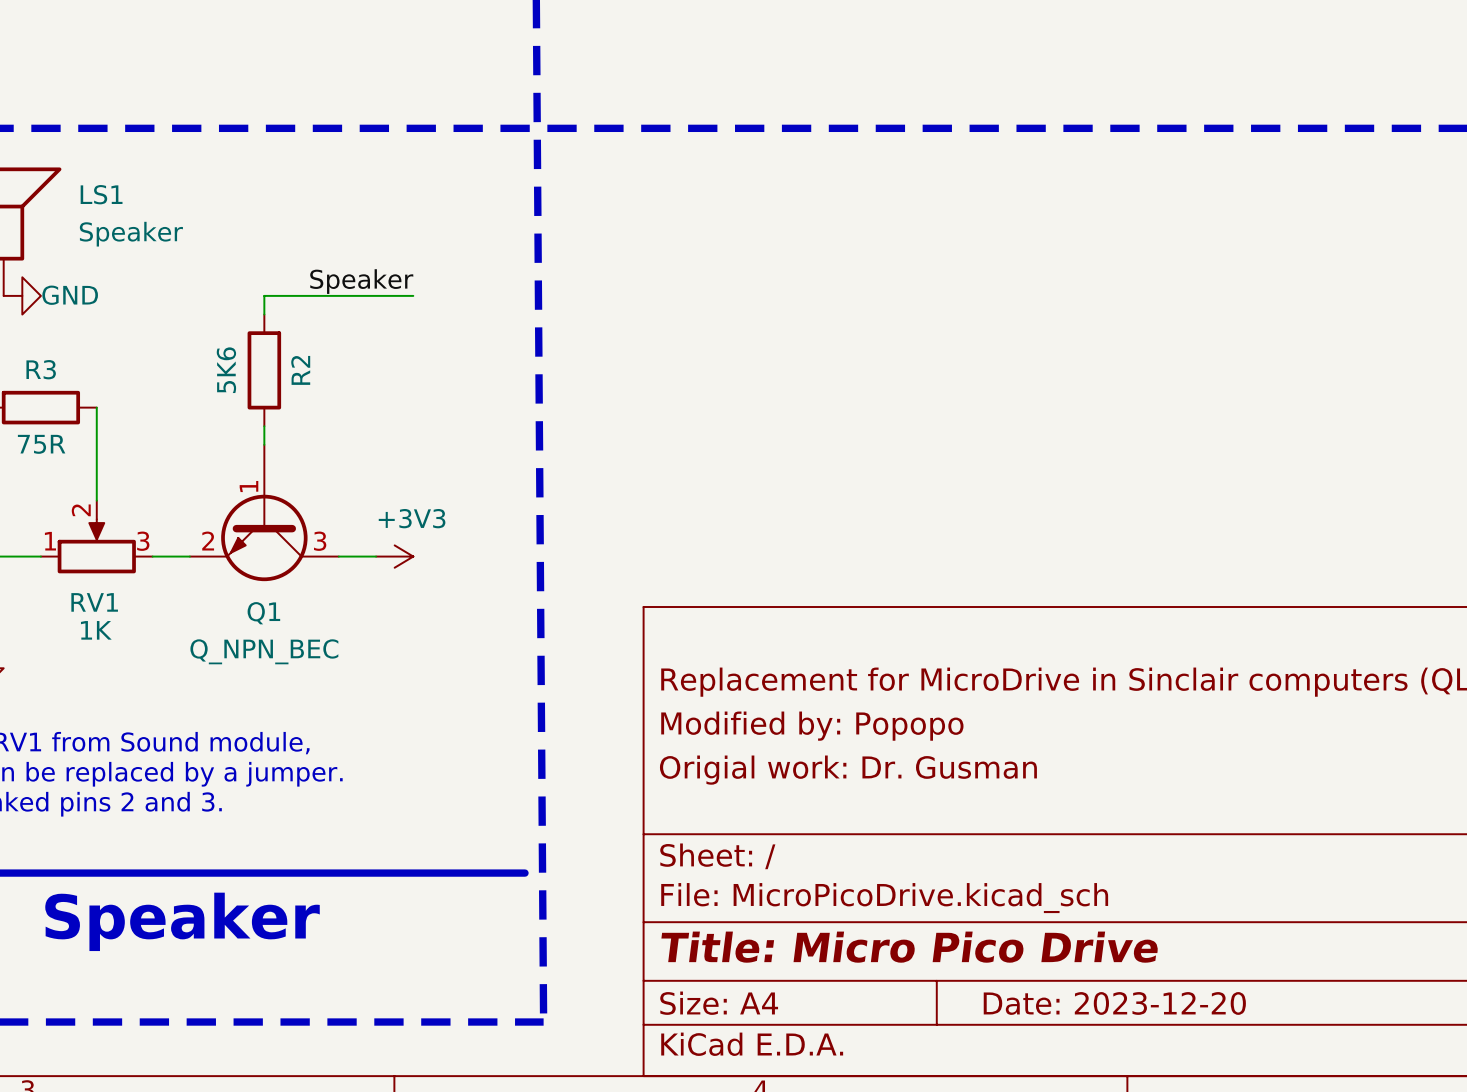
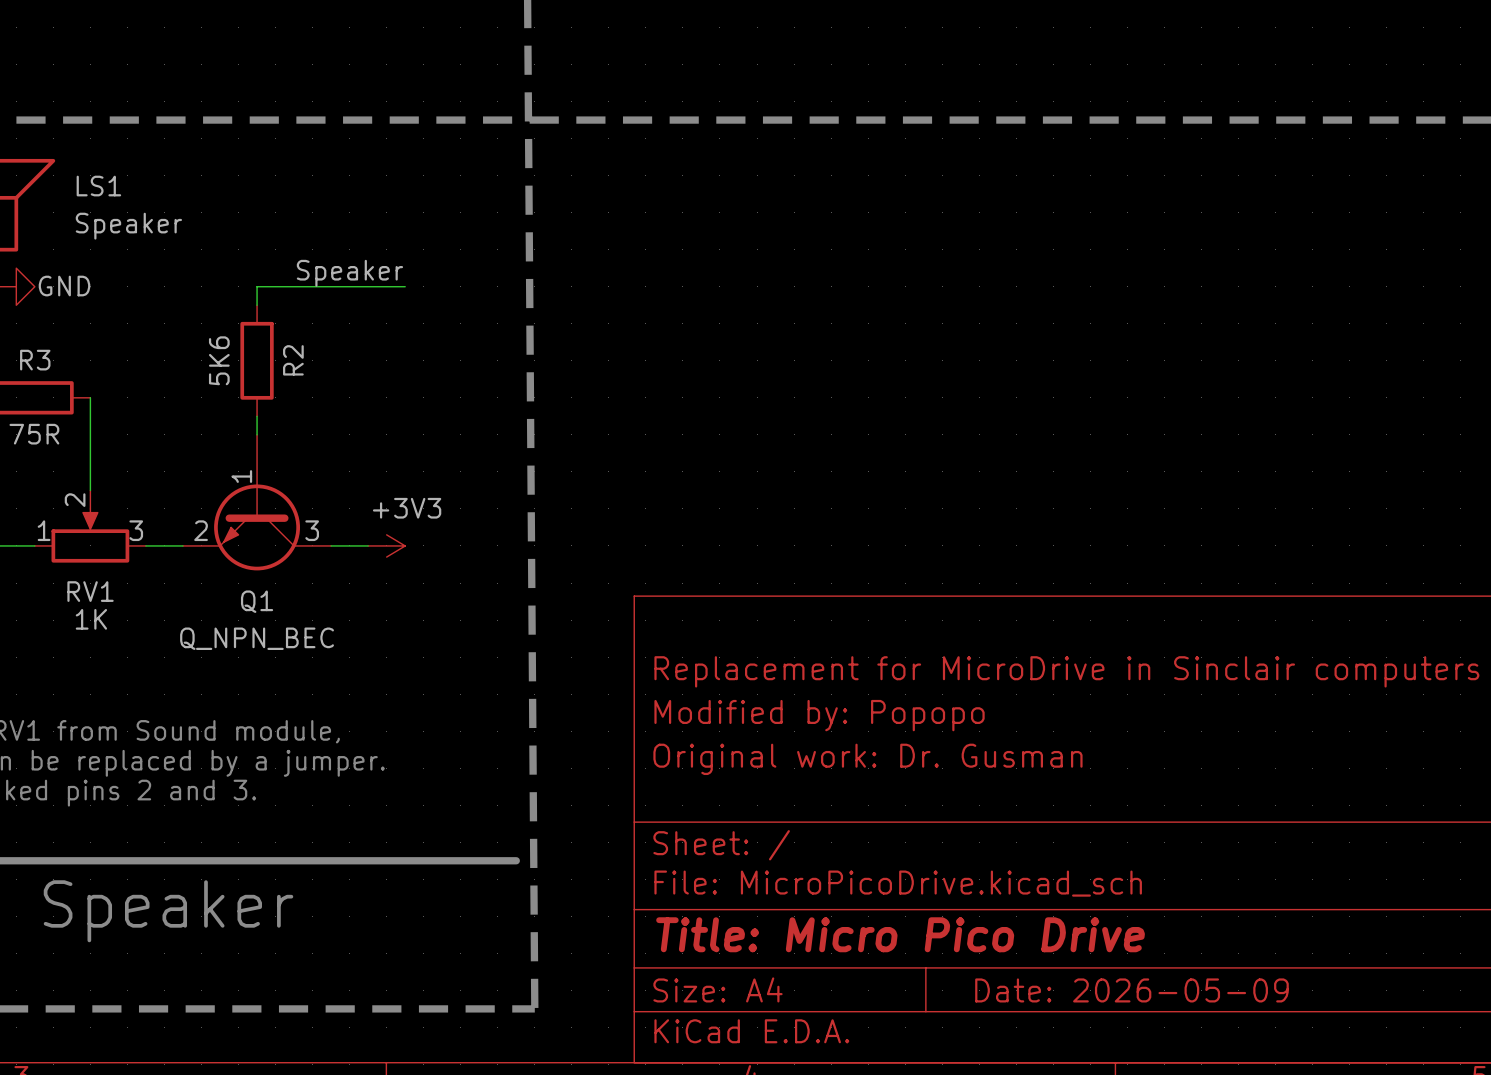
title block: Origial work: Dr. Gusman (848, 770) -> Original work: Dr. Gusman (867, 759)
title block: Date: 2023-12-20 (1114, 1003) -> Date: 2026-05-09 (1131, 990)

